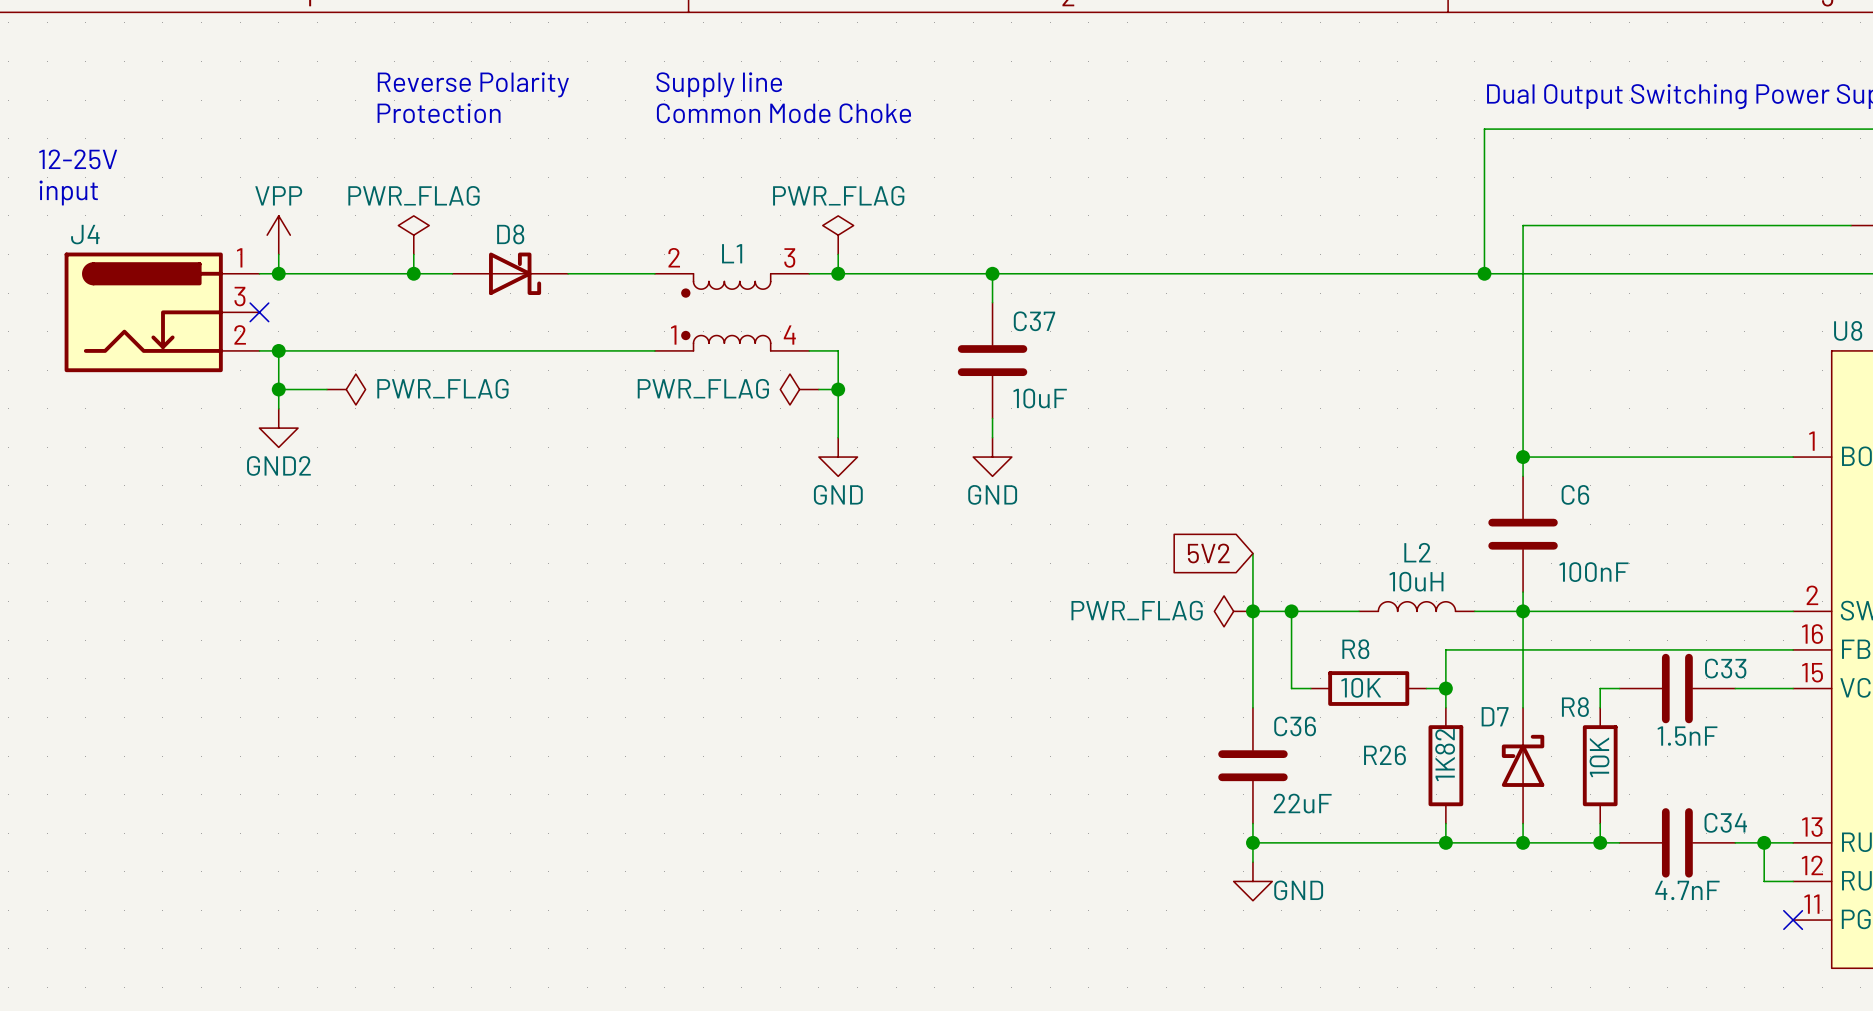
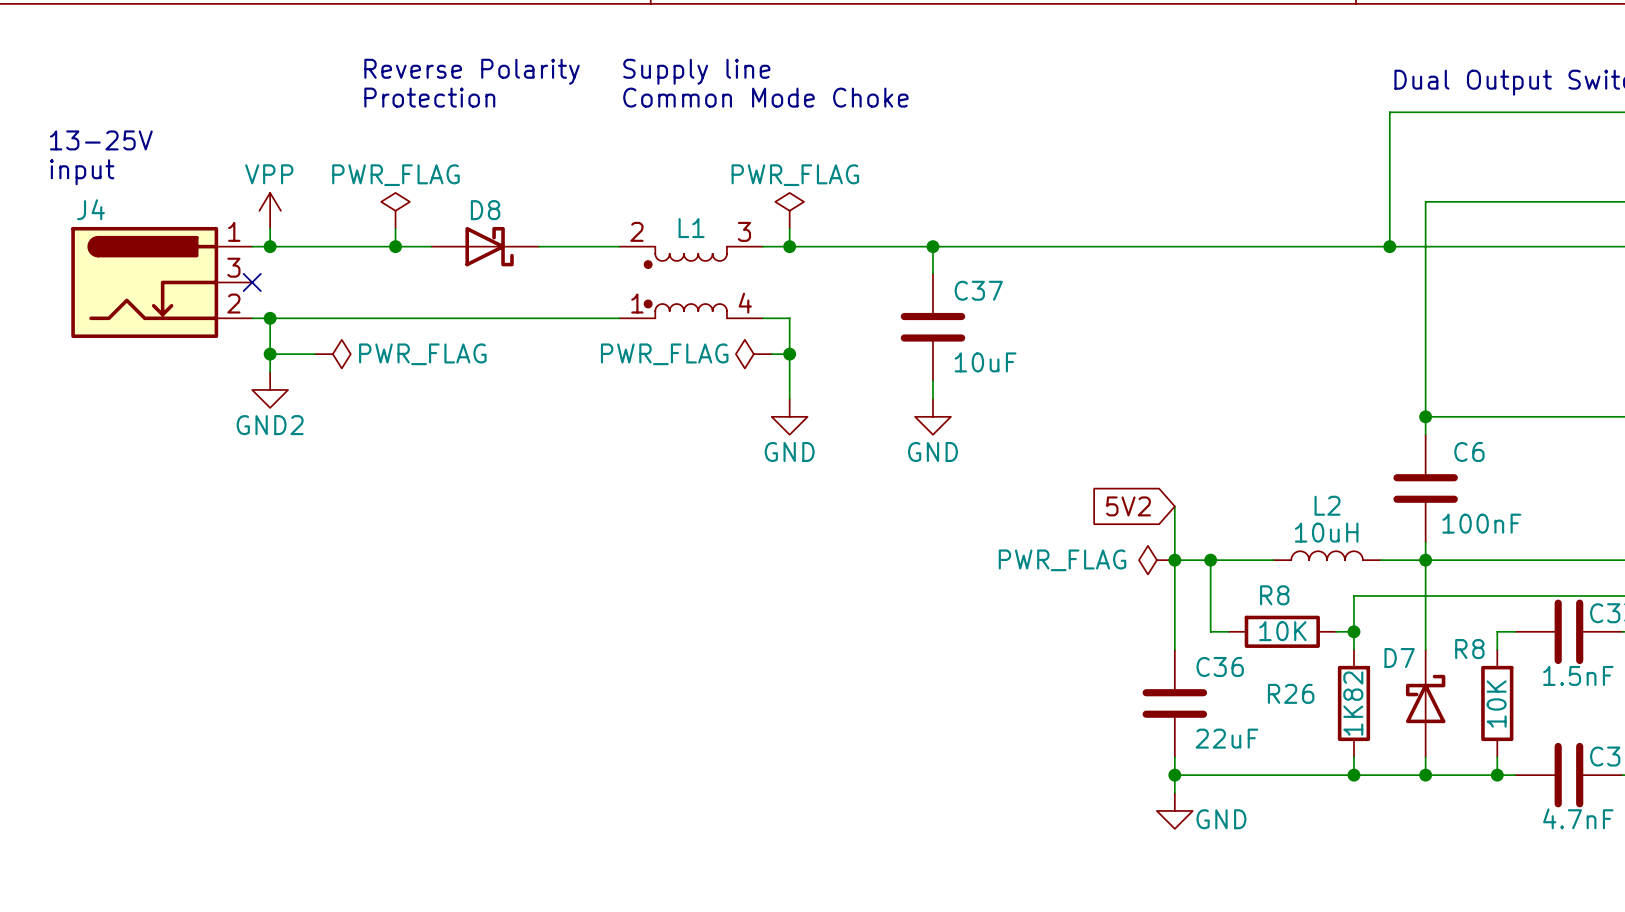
text: 12-25V (78, 159) -> 13-25V (101, 140)

